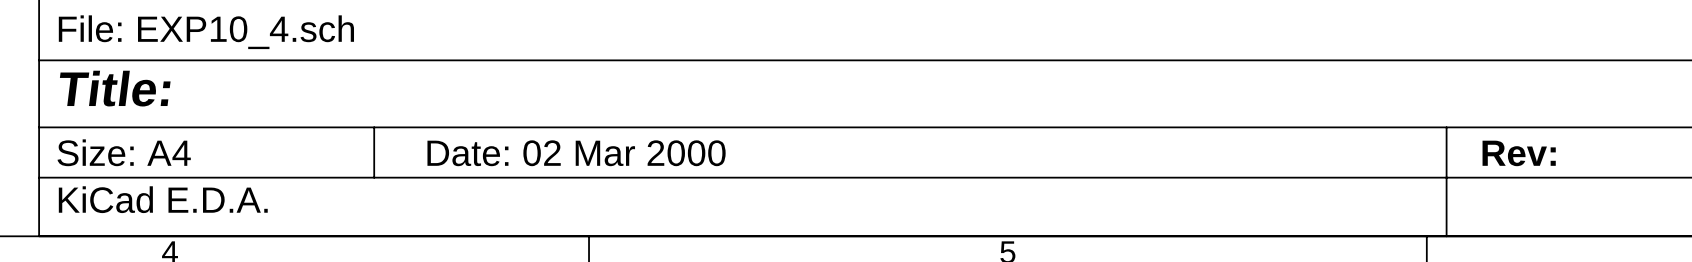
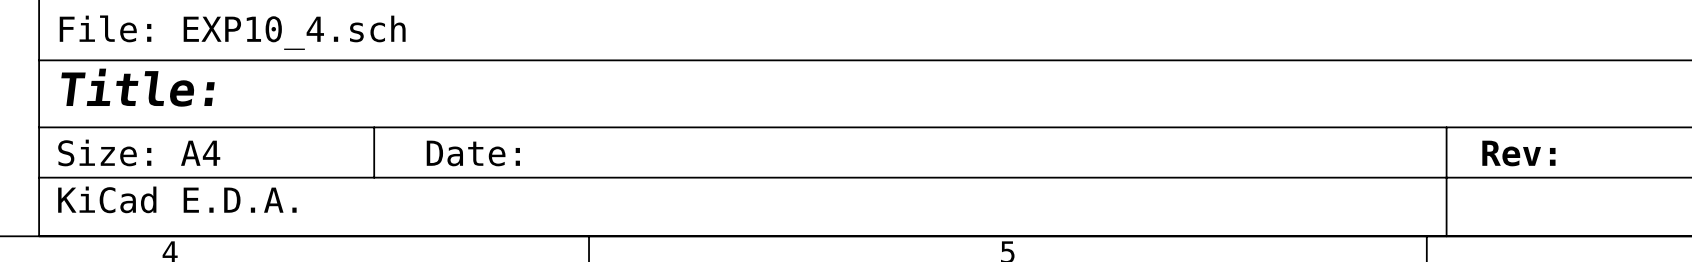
title block: Date: 02 Mar 2000 (576, 153) -> Date: (473, 153)

